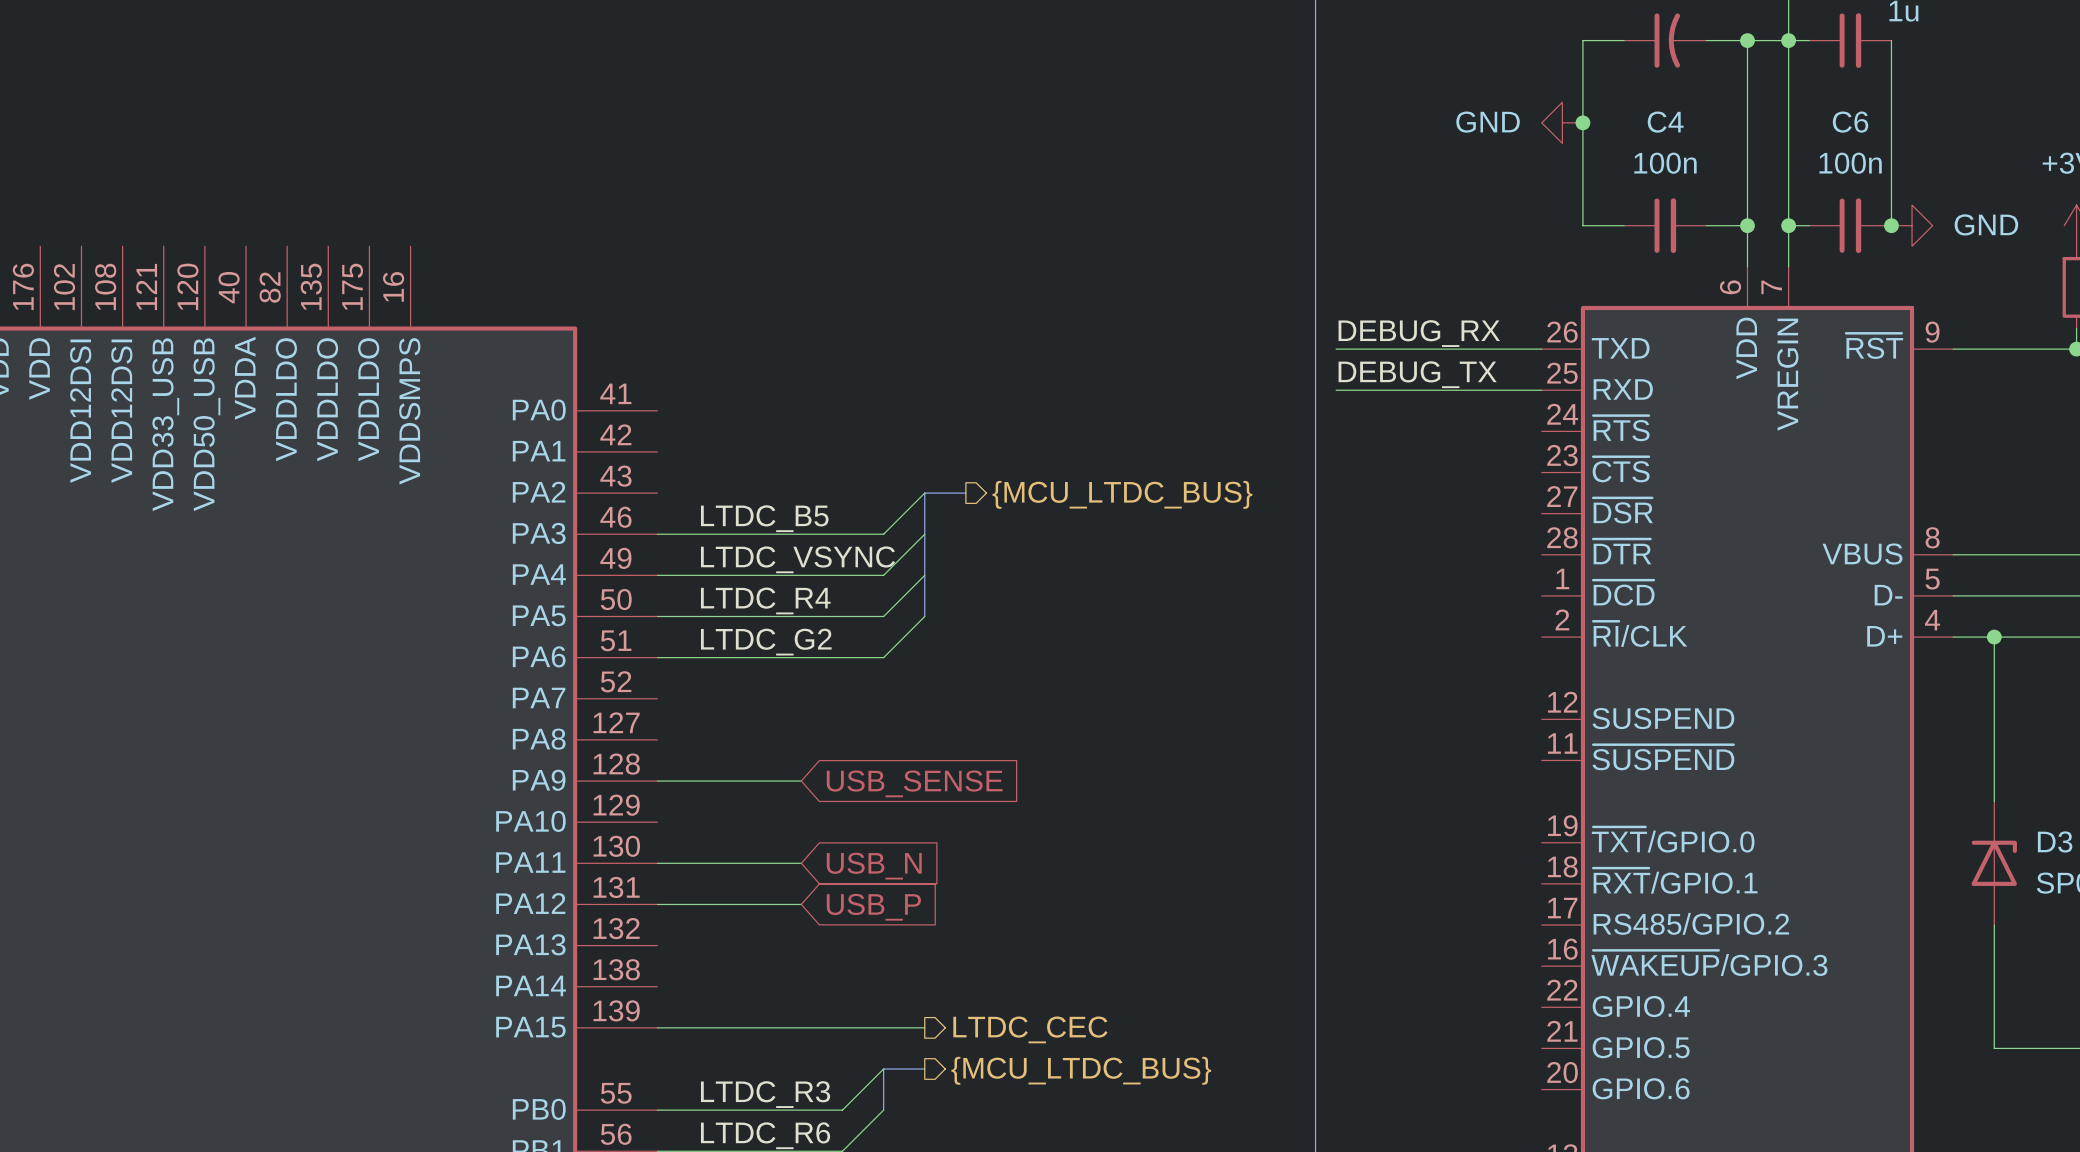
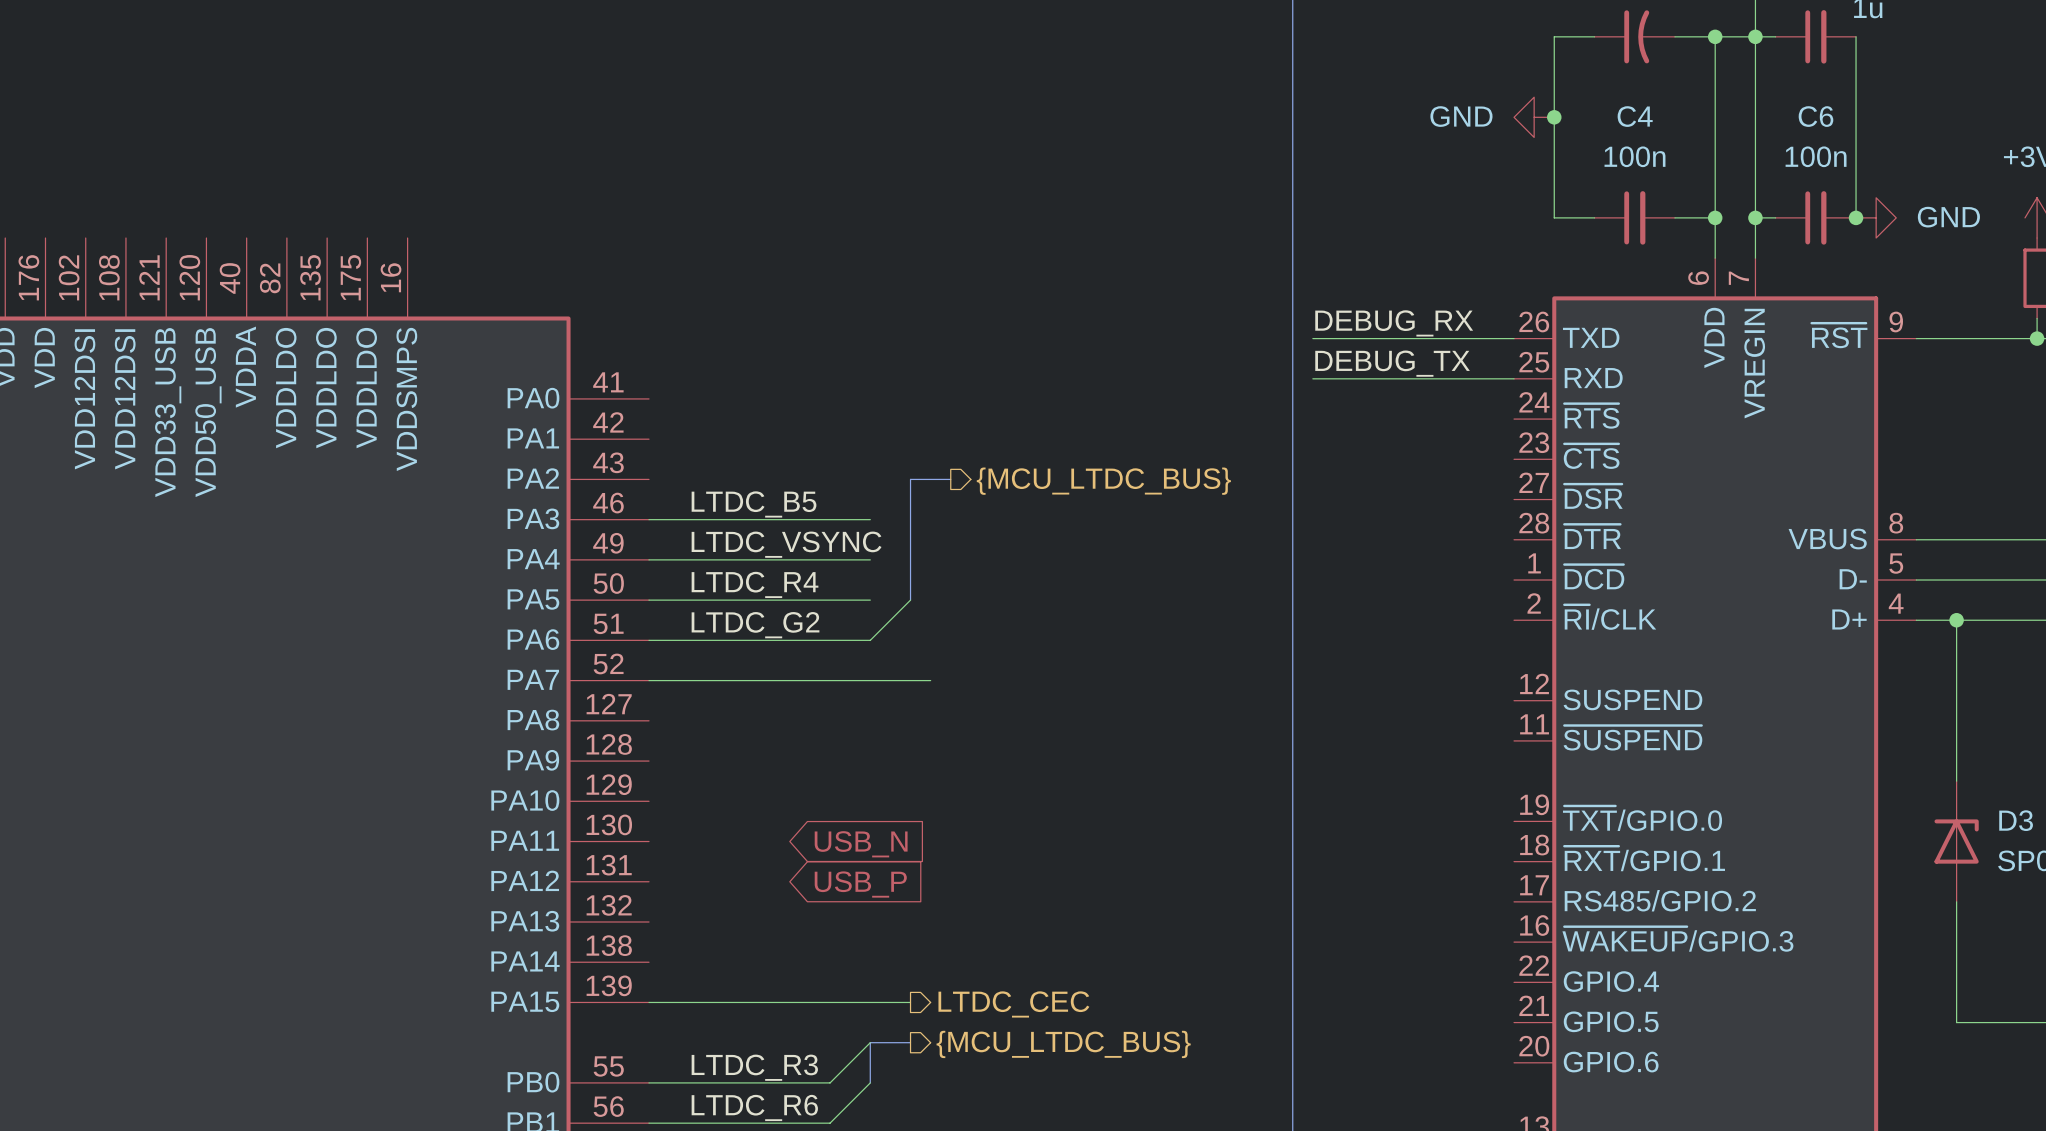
wire: (924, 493) (883, 534) -> none
wire: (924, 534) (883, 575) -> none
wire: (924, 575) (883, 616) -> none
wire: none -> (649, 680) (930, 680)
wire: (657, 781) (801, 781) -> none
global label: USB_SENSE (914, 783) -> none
wire: (657, 863) (801, 863) -> none
wire: (657, 904) (801, 904) -> none

